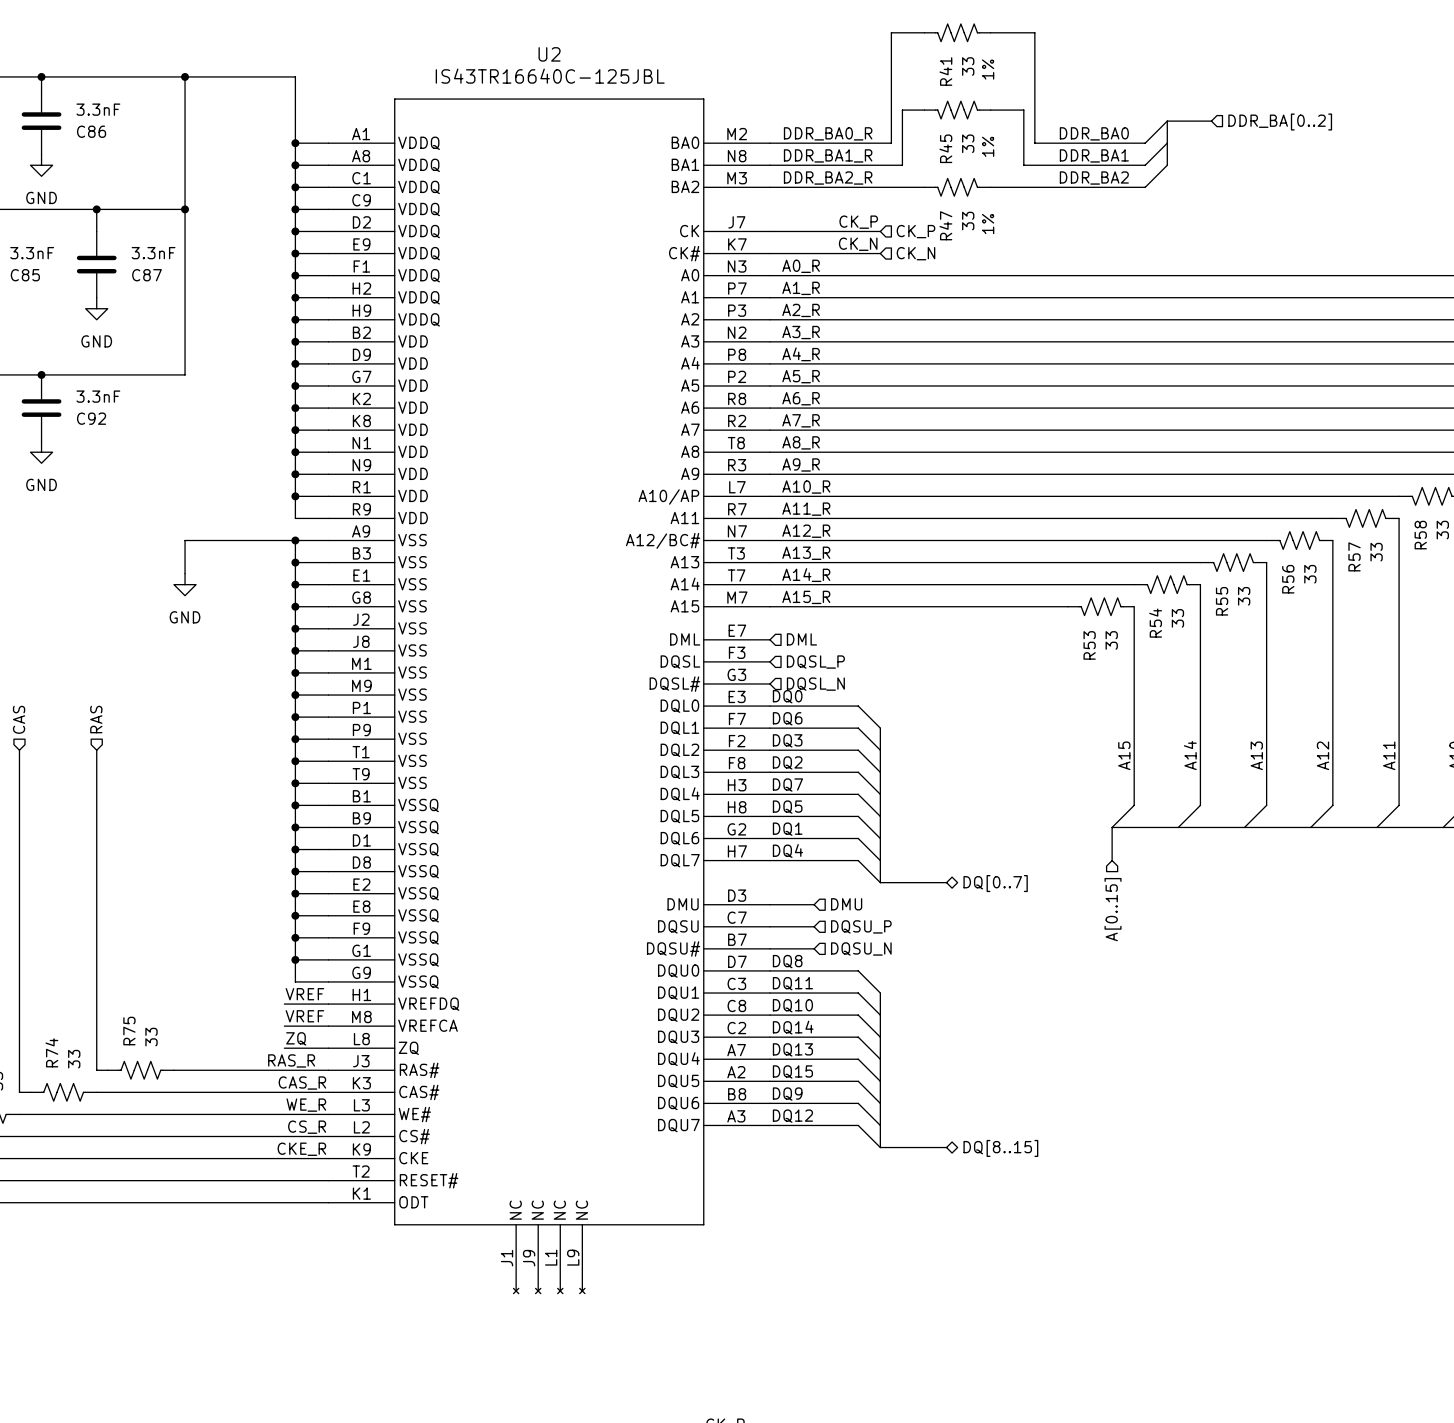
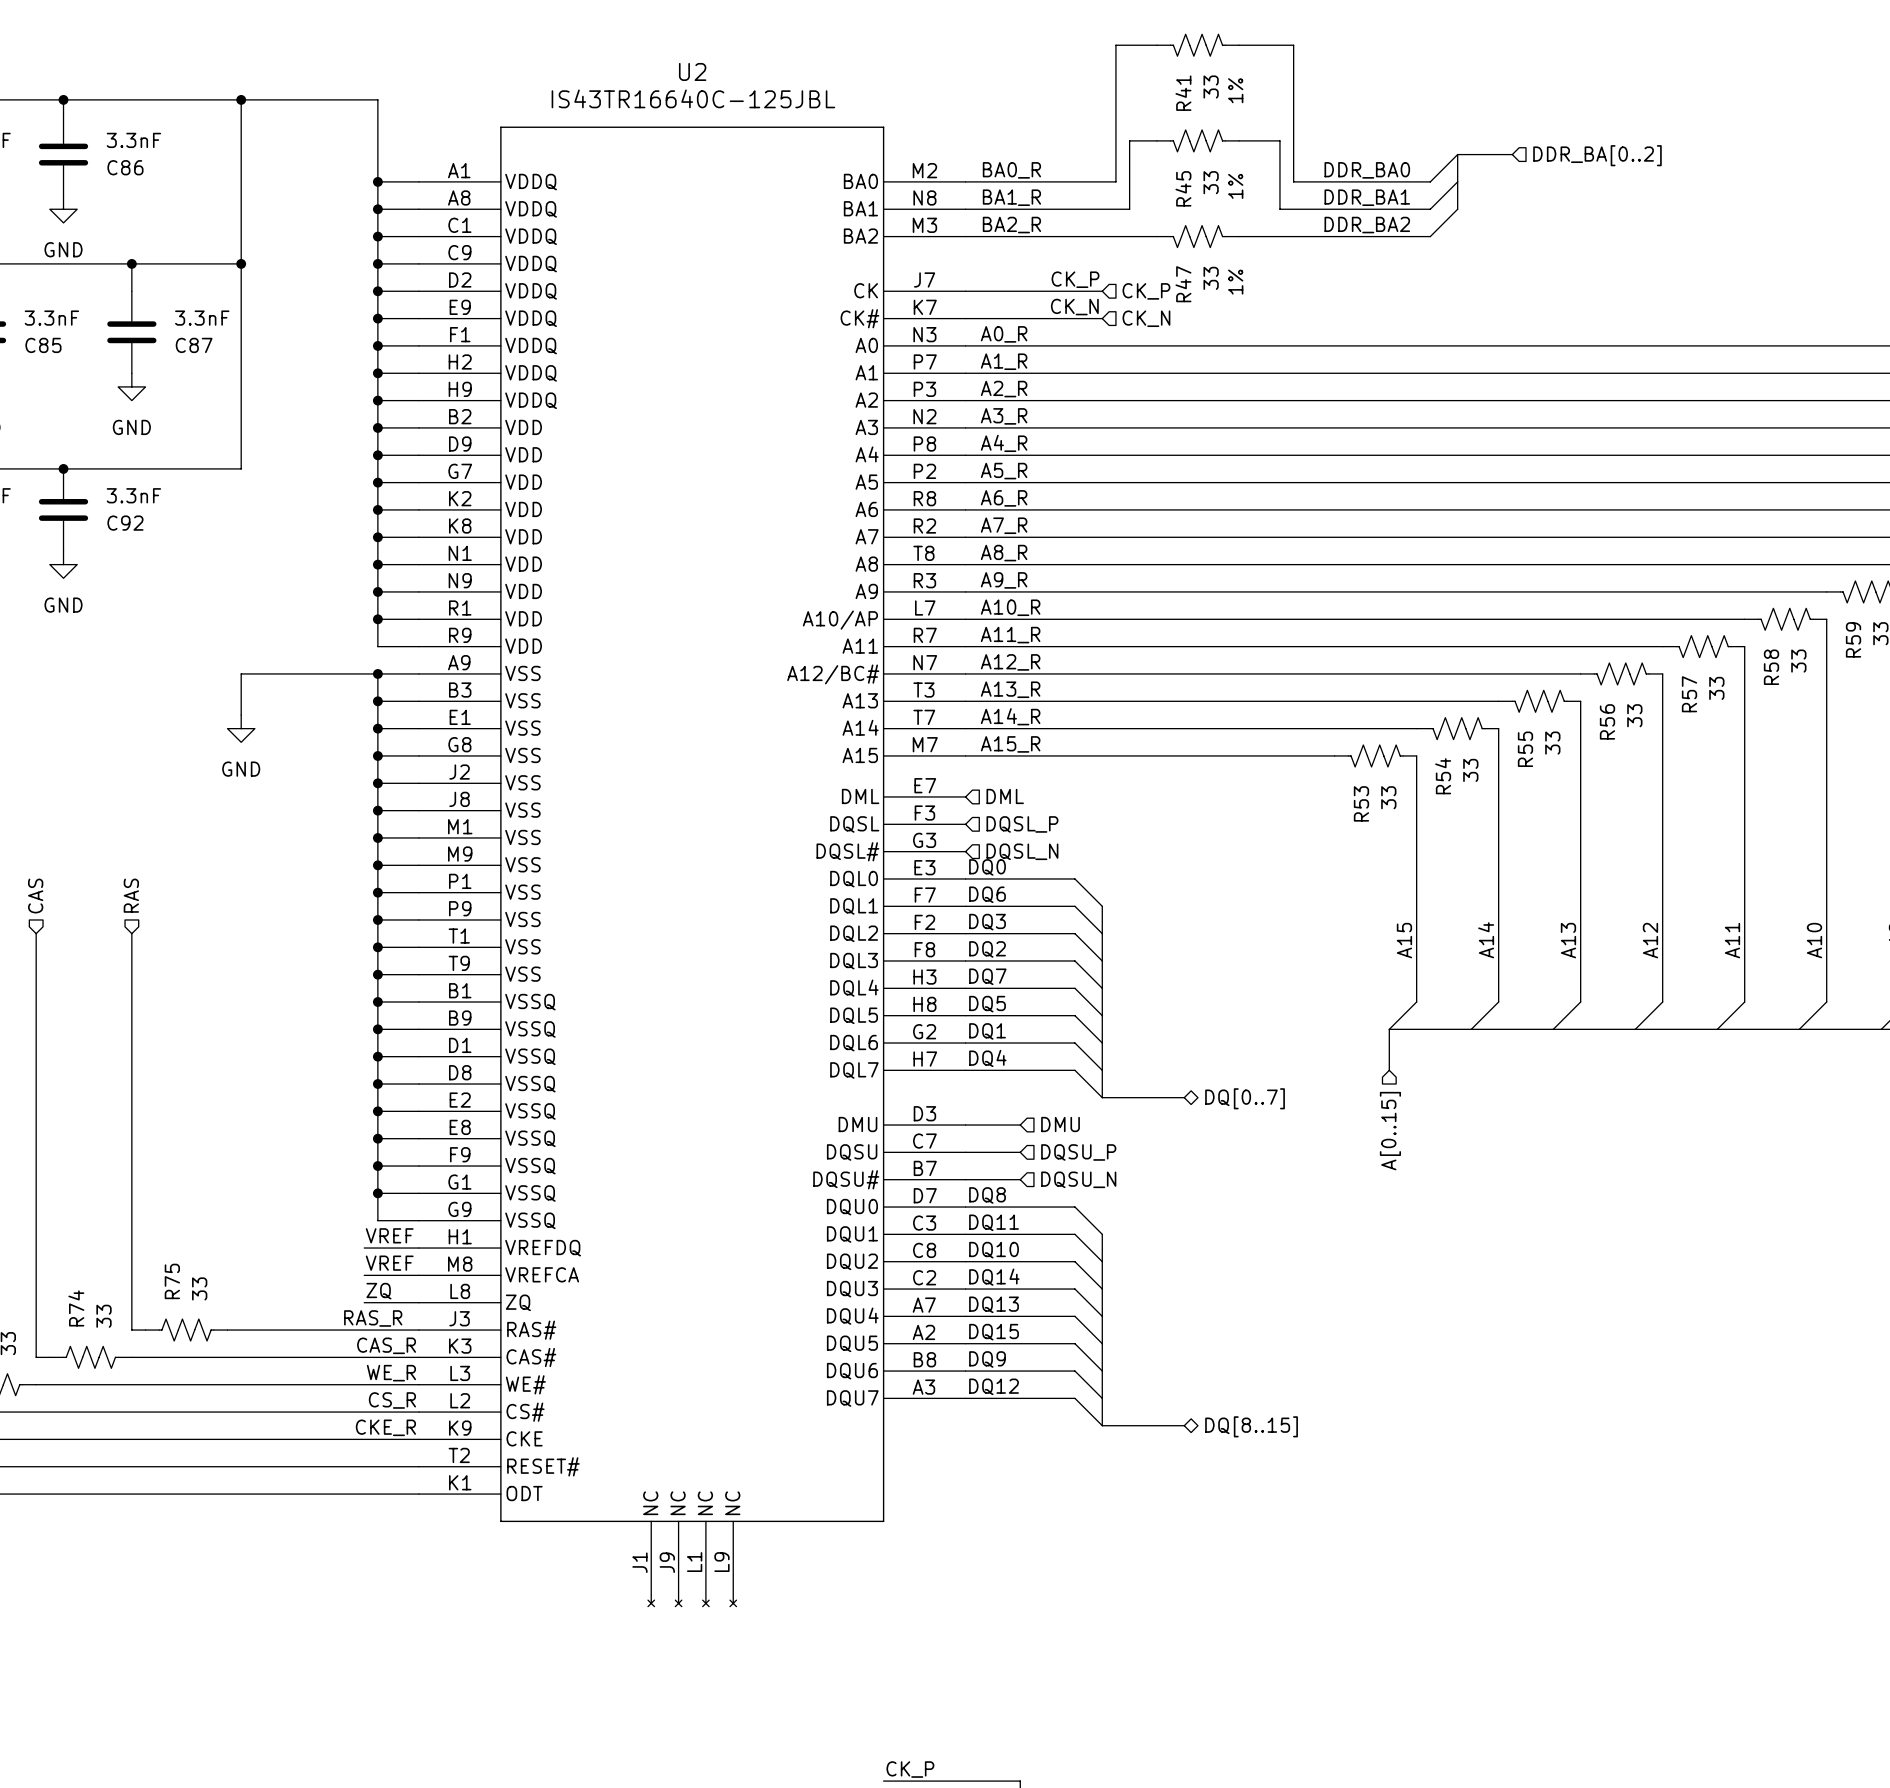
label: DDR_BA0_R (828, 133) -> BA0_R (1011, 170)
label: DDR_BA1_R (828, 155) -> BA1_R (1011, 197)
label: DDR_BA2_R (828, 178) -> BA2_R (1011, 225)

